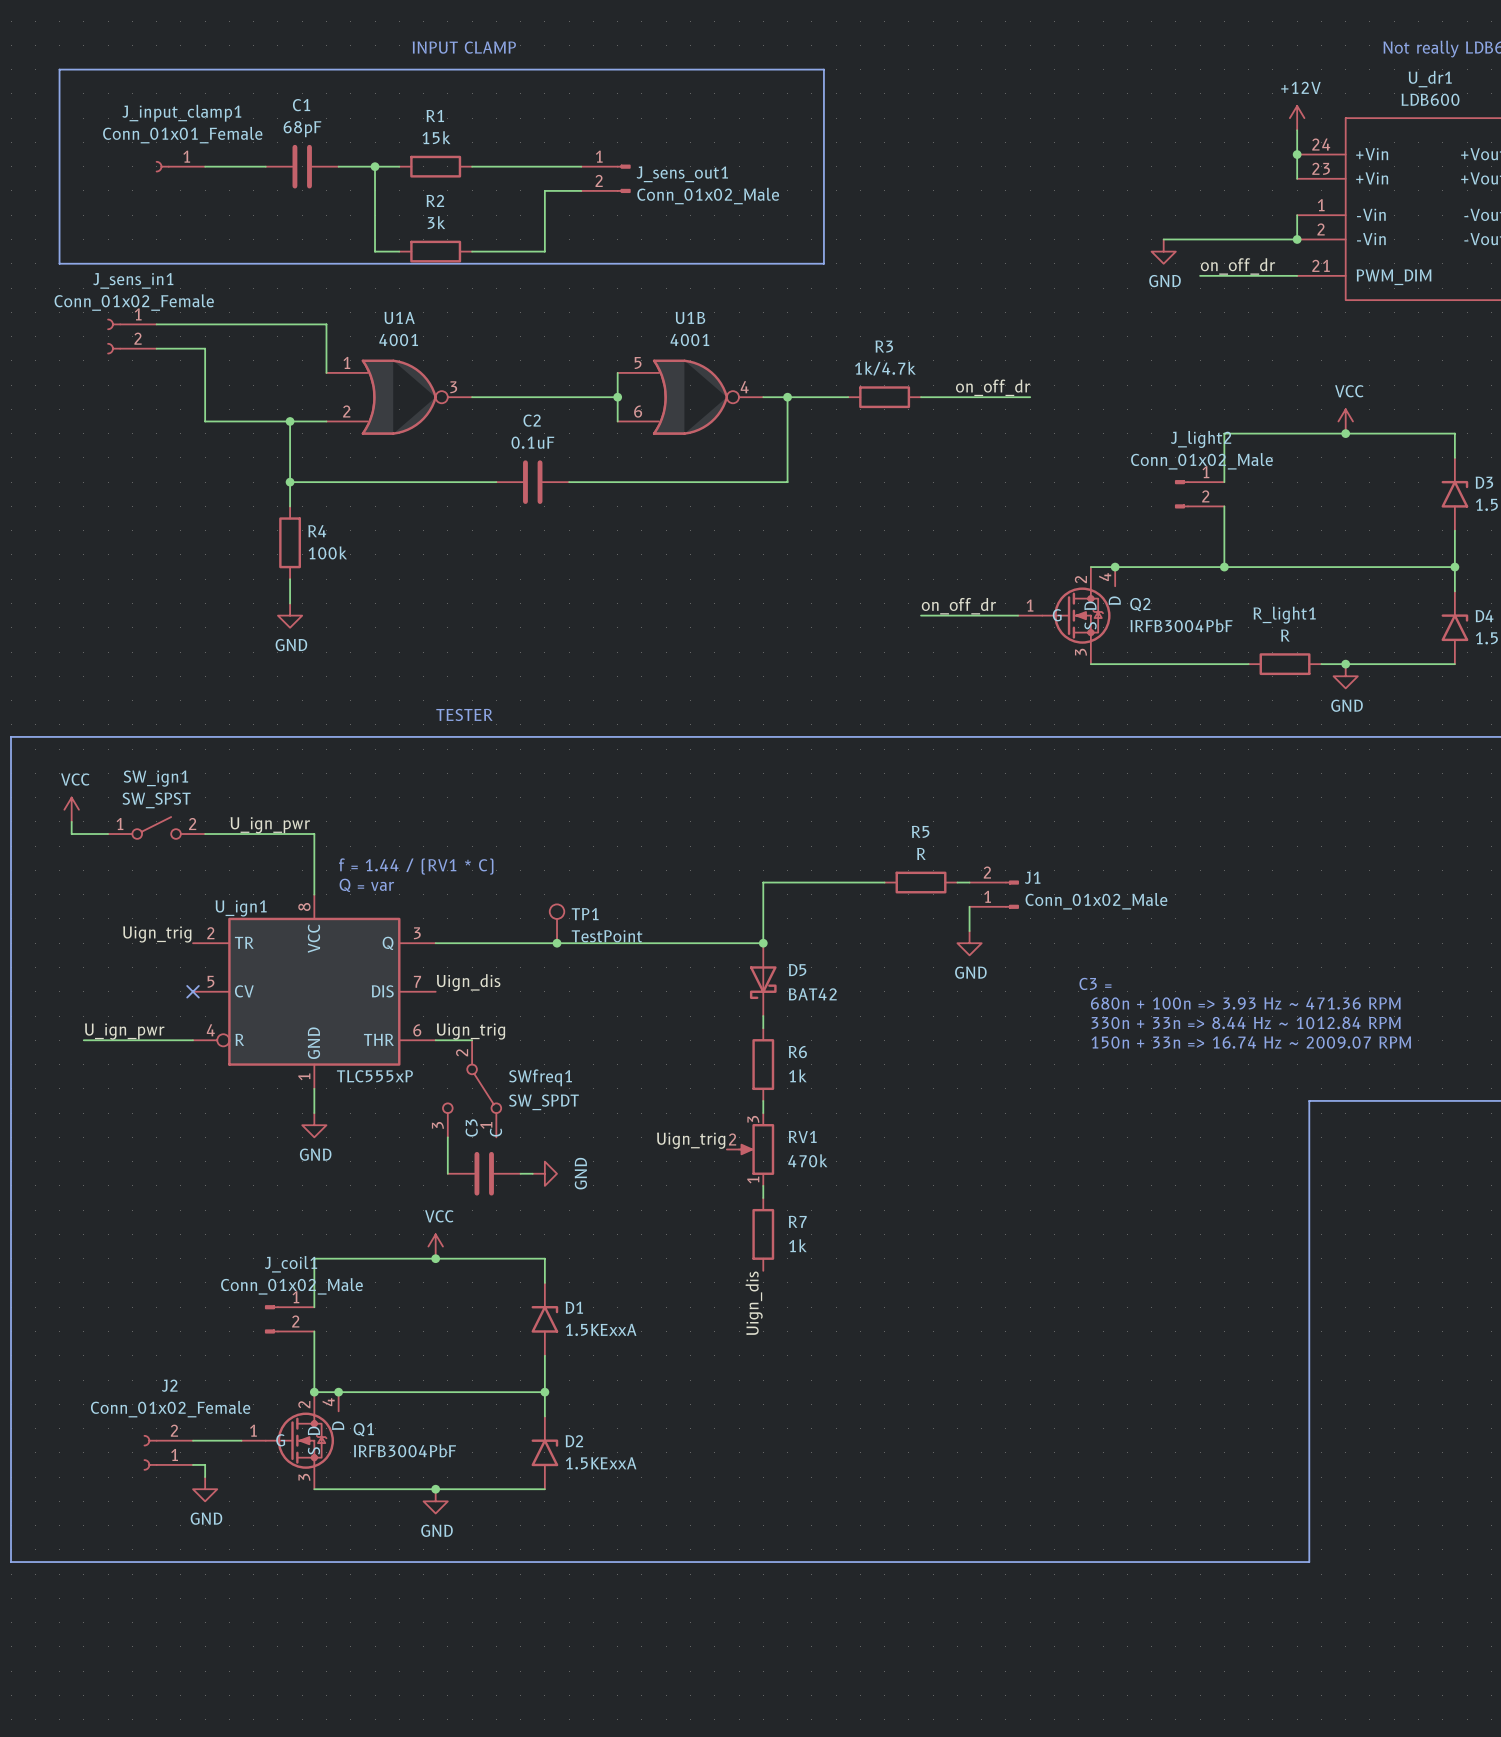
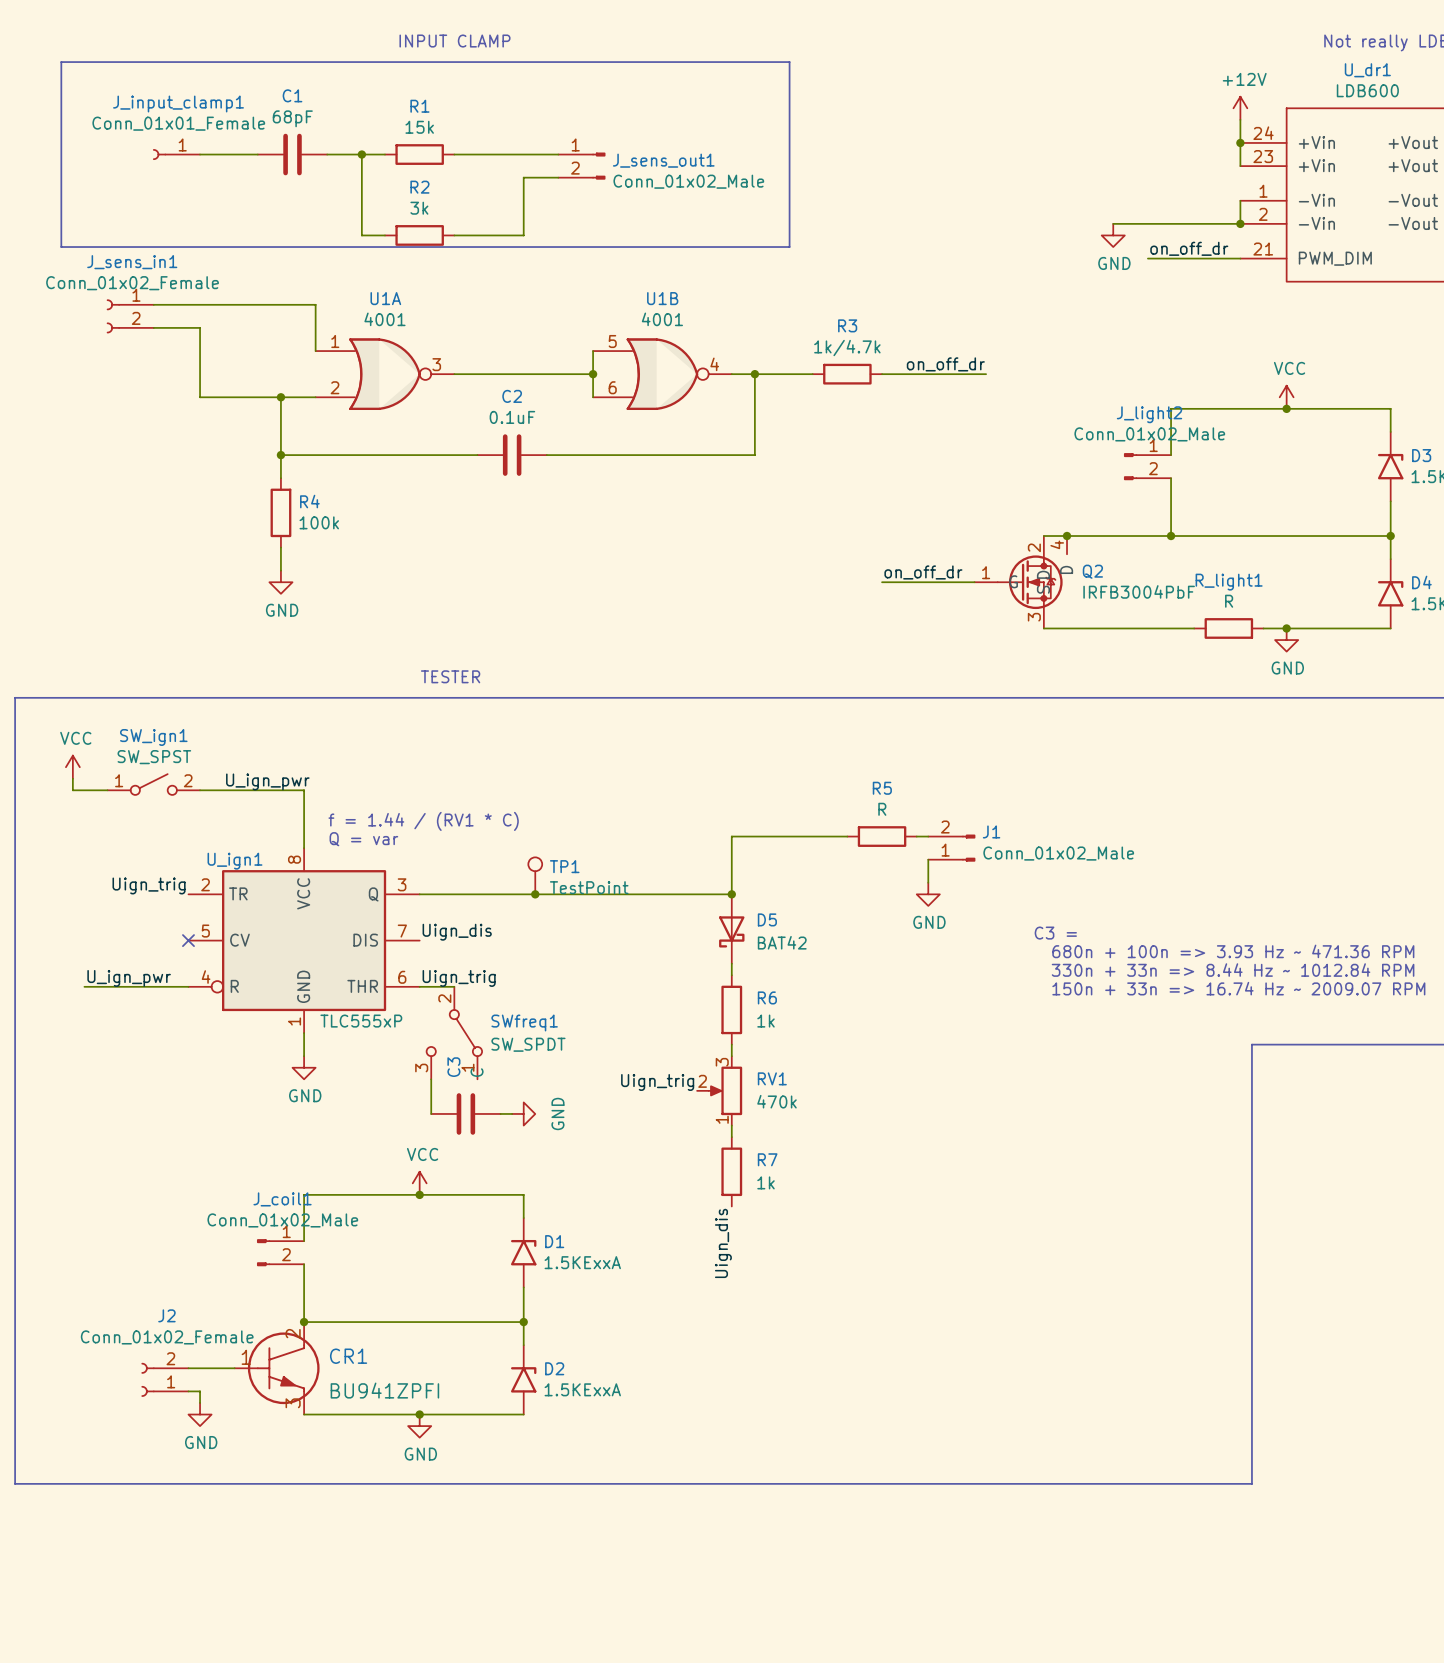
junction: (338, 1392) -> none
CR1: none -> BU941ZPFI (277, 1368)
Q1: IRFB3004PbF (290, 1440) -> none

